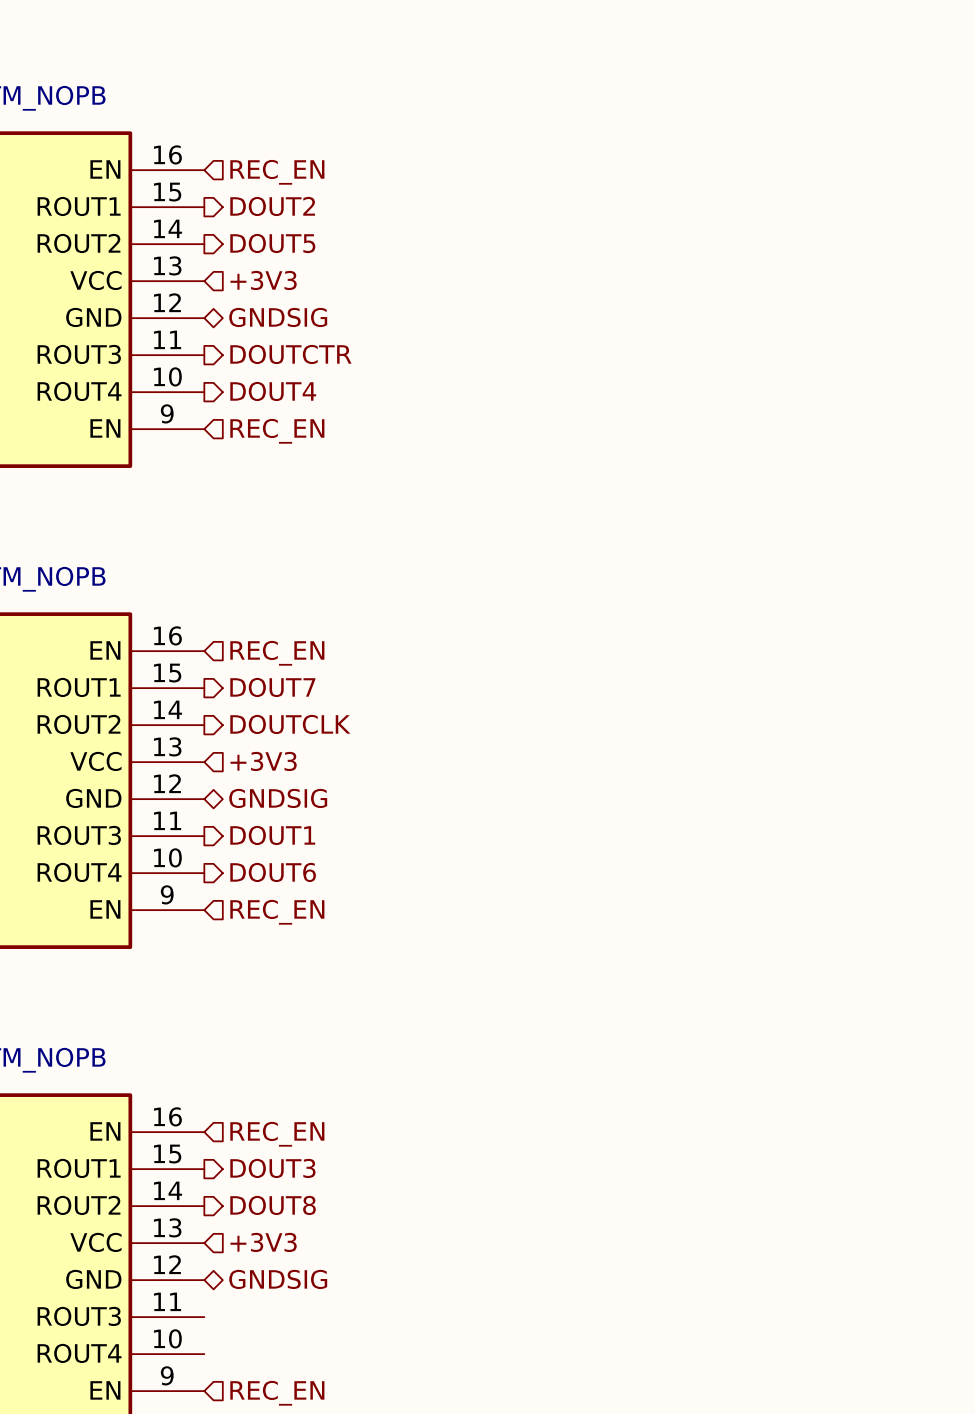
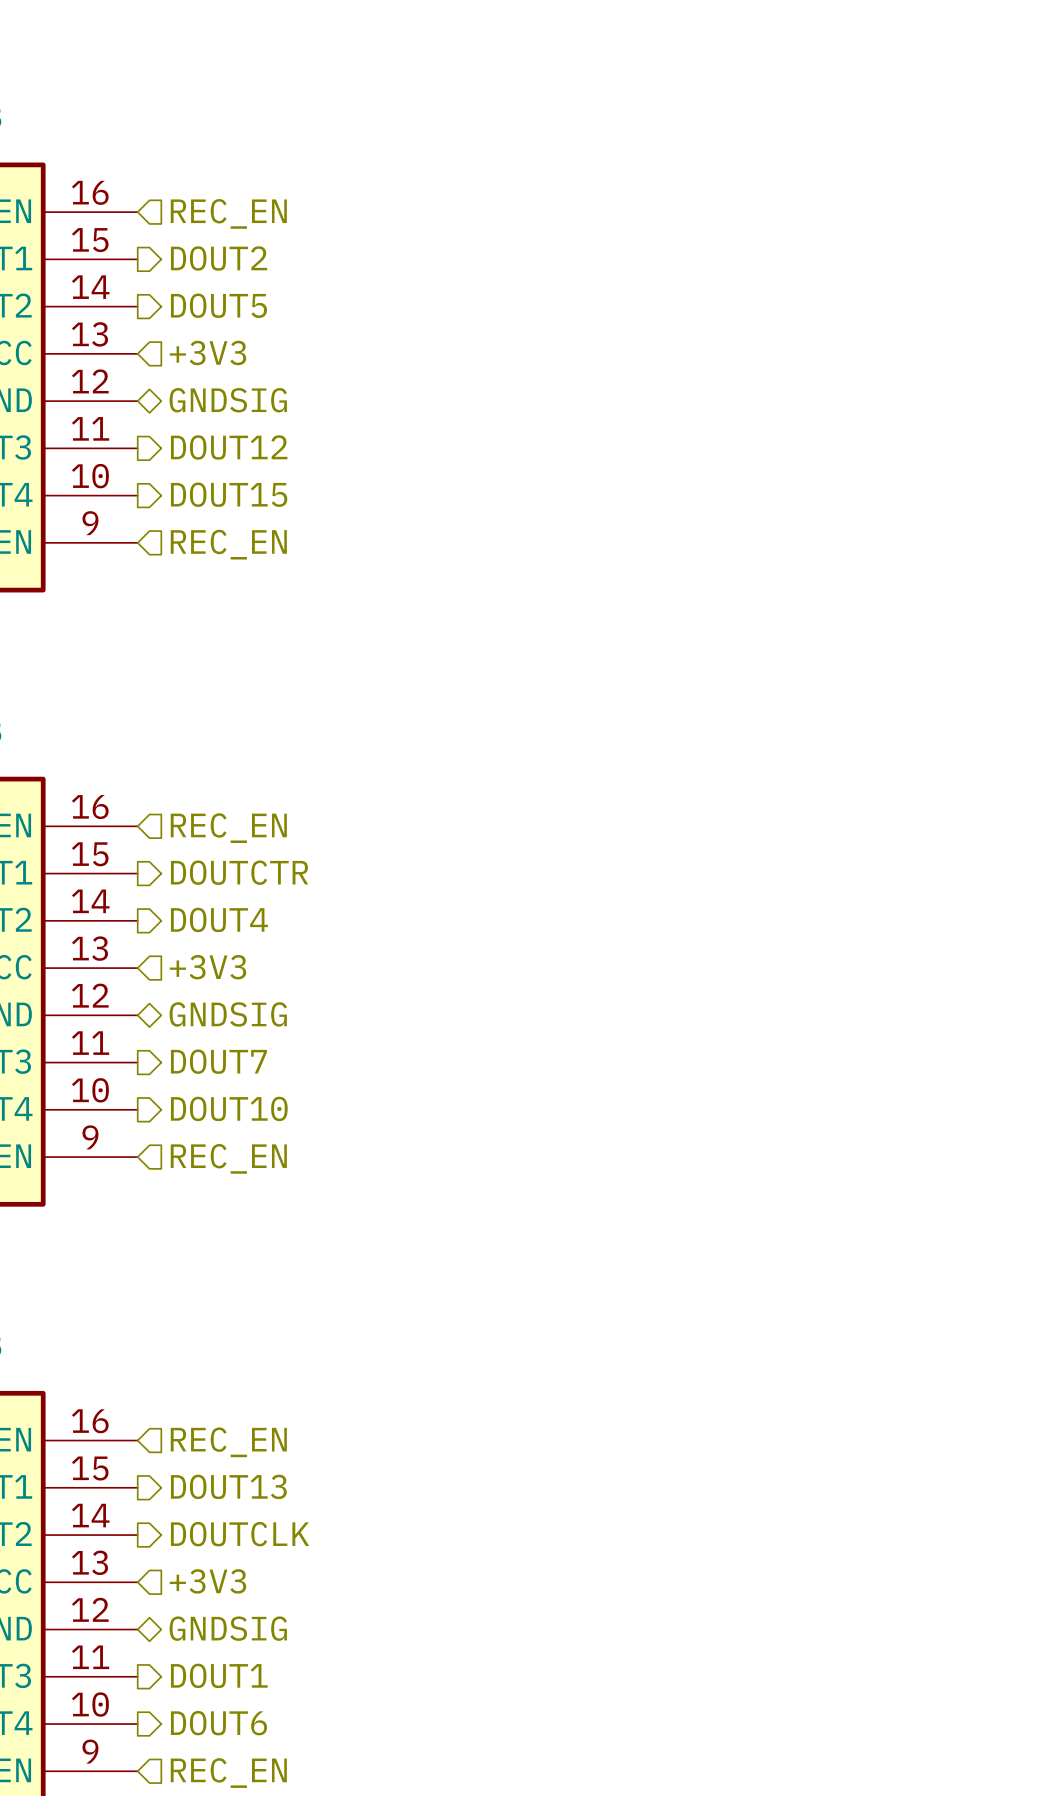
hierarchical label: DOUTCTR (290, 354) -> DOUT12 (229, 447)
hierarchical label: DOUT4 (273, 391) -> DOUT15 (229, 494)
hierarchical label: DOUT7 (272, 687) -> DOUTCTR (239, 872)
hierarchical label: DOUTCLK (290, 724) -> DOUT4 (219, 919)
hierarchical label: DOUT1 (272, 835) -> DOUT7 (218, 1061)
hierarchical label: DOUT6 (273, 872) -> DOUT10 (229, 1108)
hierarchical label: DOUT3 (272, 1168) -> DOUT13 (228, 1486)
hierarchical label: DOUT8 (273, 1205) -> DOUTCLK (240, 1534)
hierarchical label: none -> DOUT1 (219, 1675)
hierarchical label: none -> DOUT6 (219, 1723)

